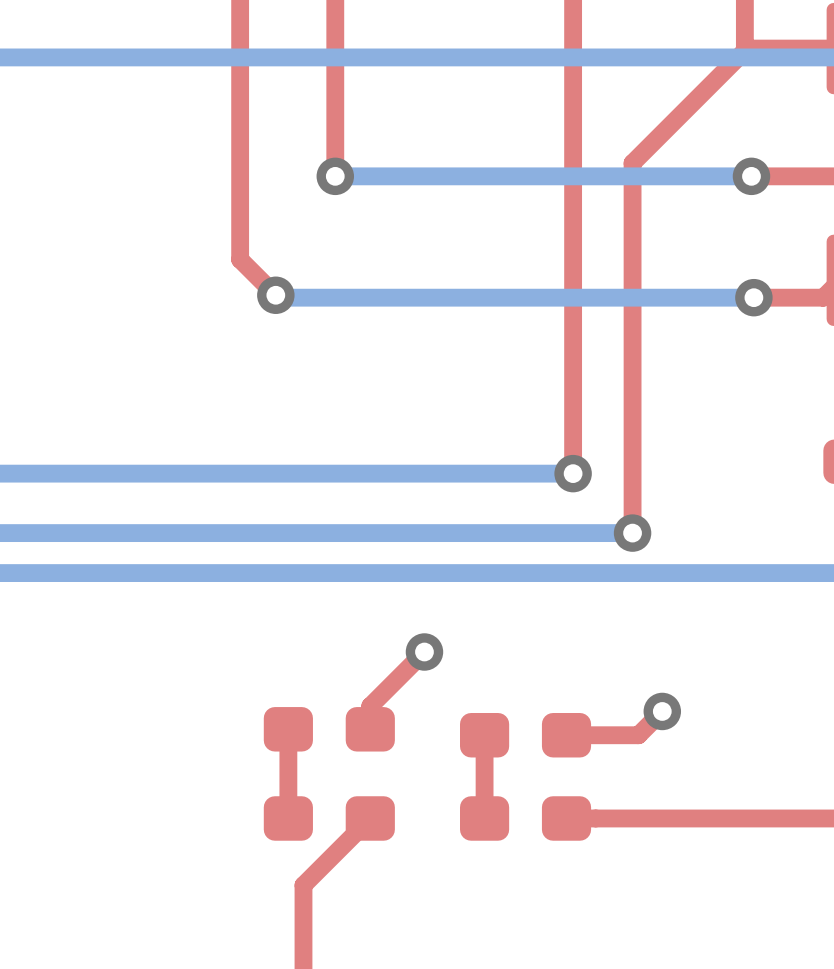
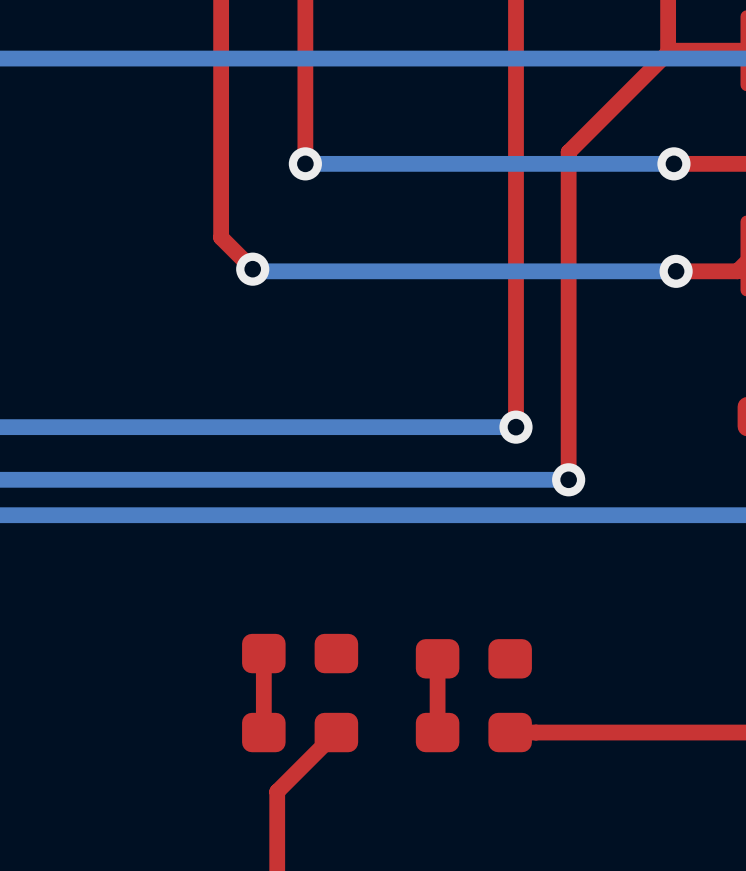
top track: (424, 652) (370, 706) (370, 729) -> none
via: (424, 652) -> none
top track: (662, 711) (638, 735) (566, 735) -> none
via: (662, 711) -> none

